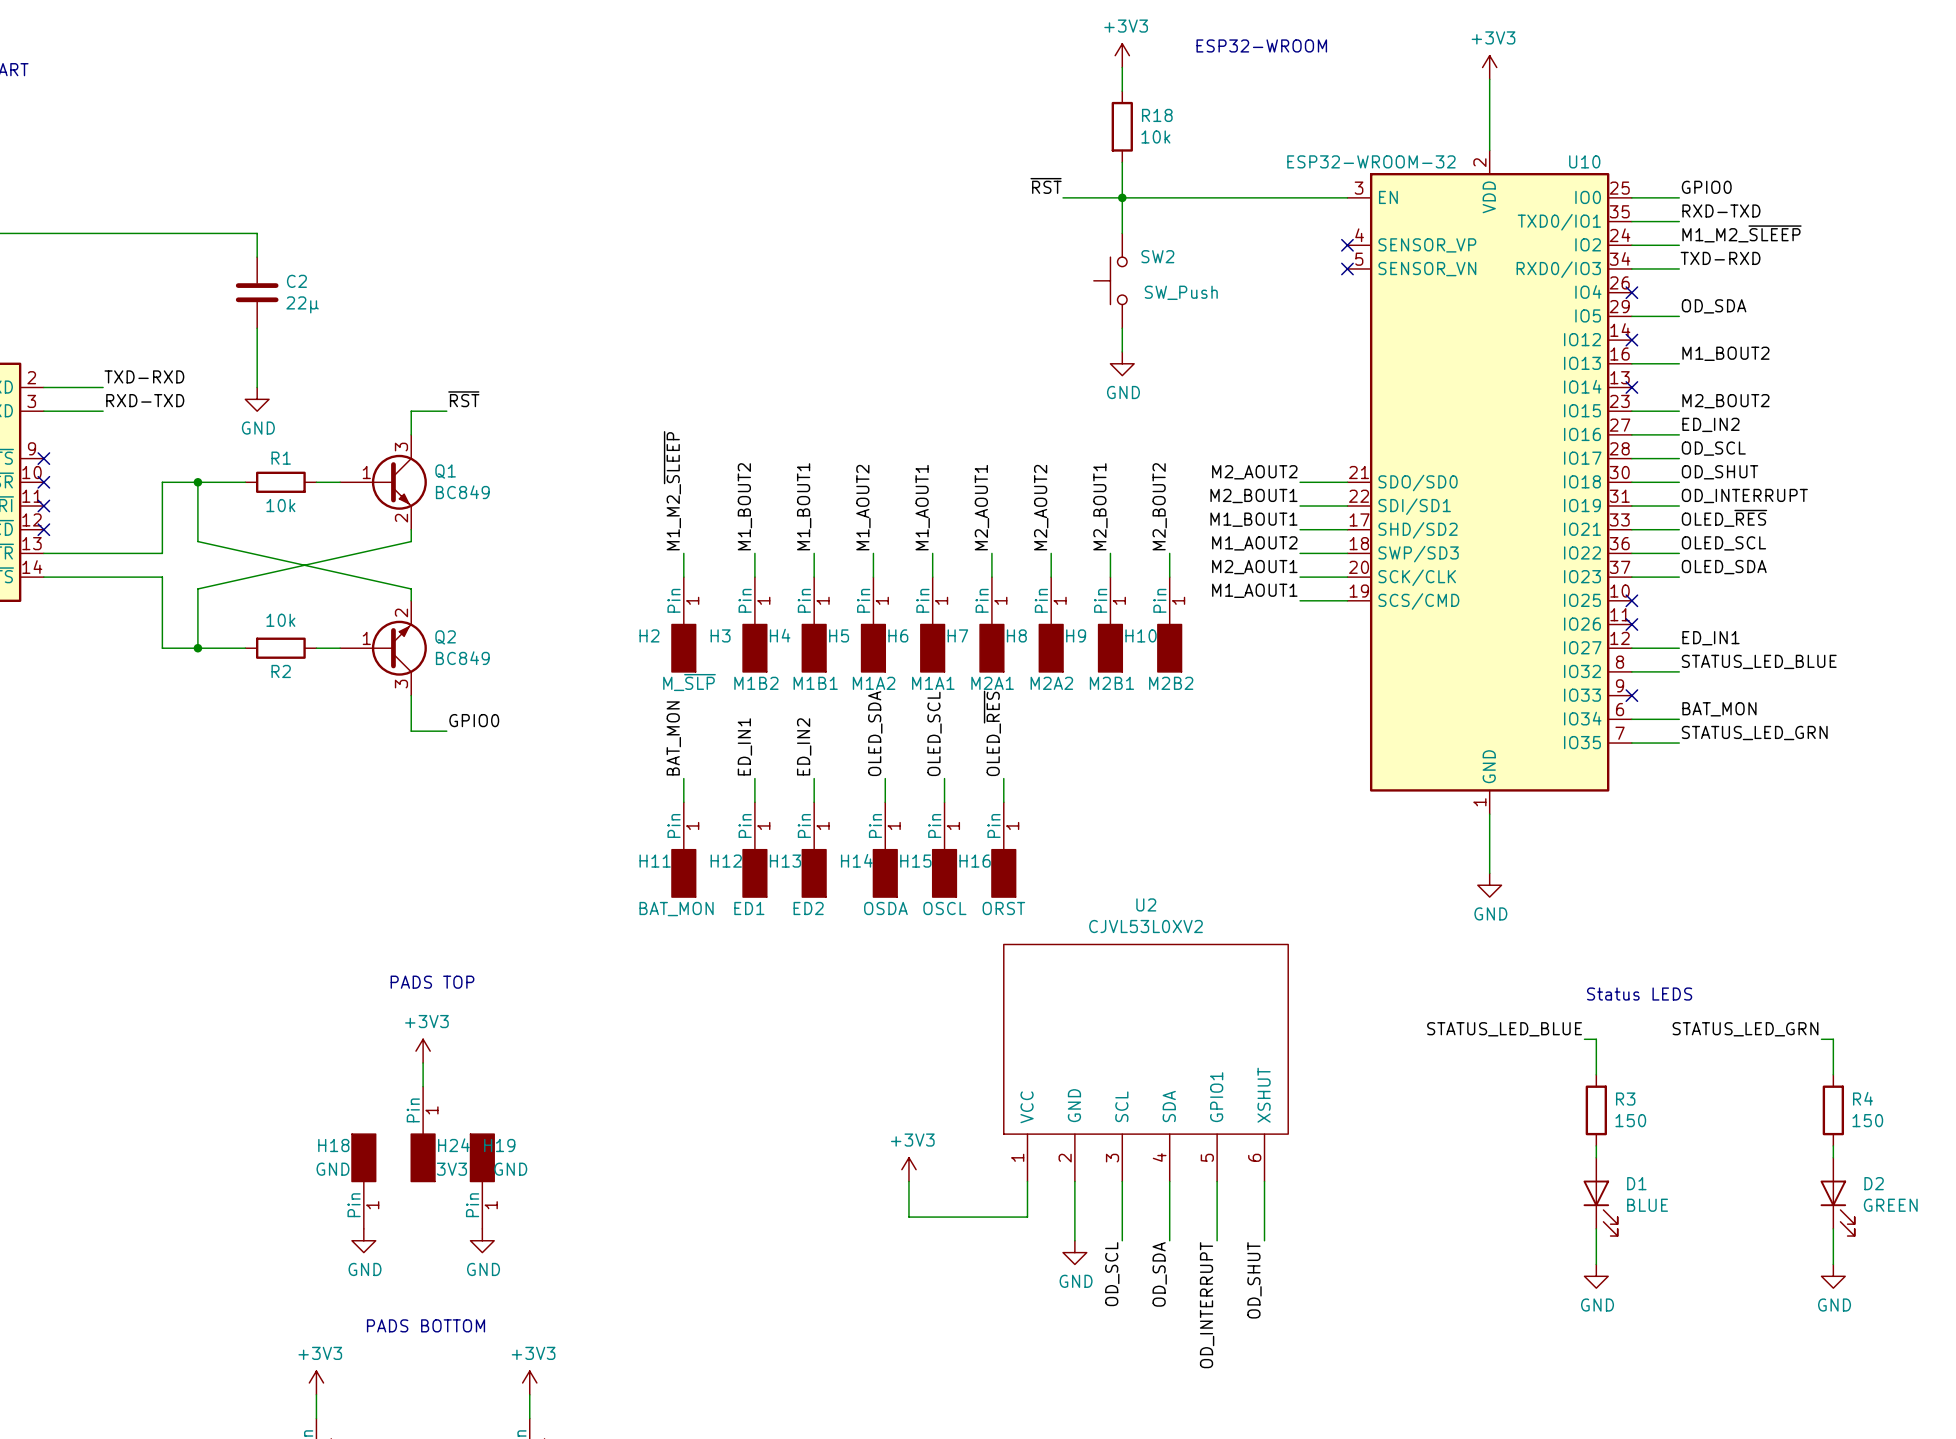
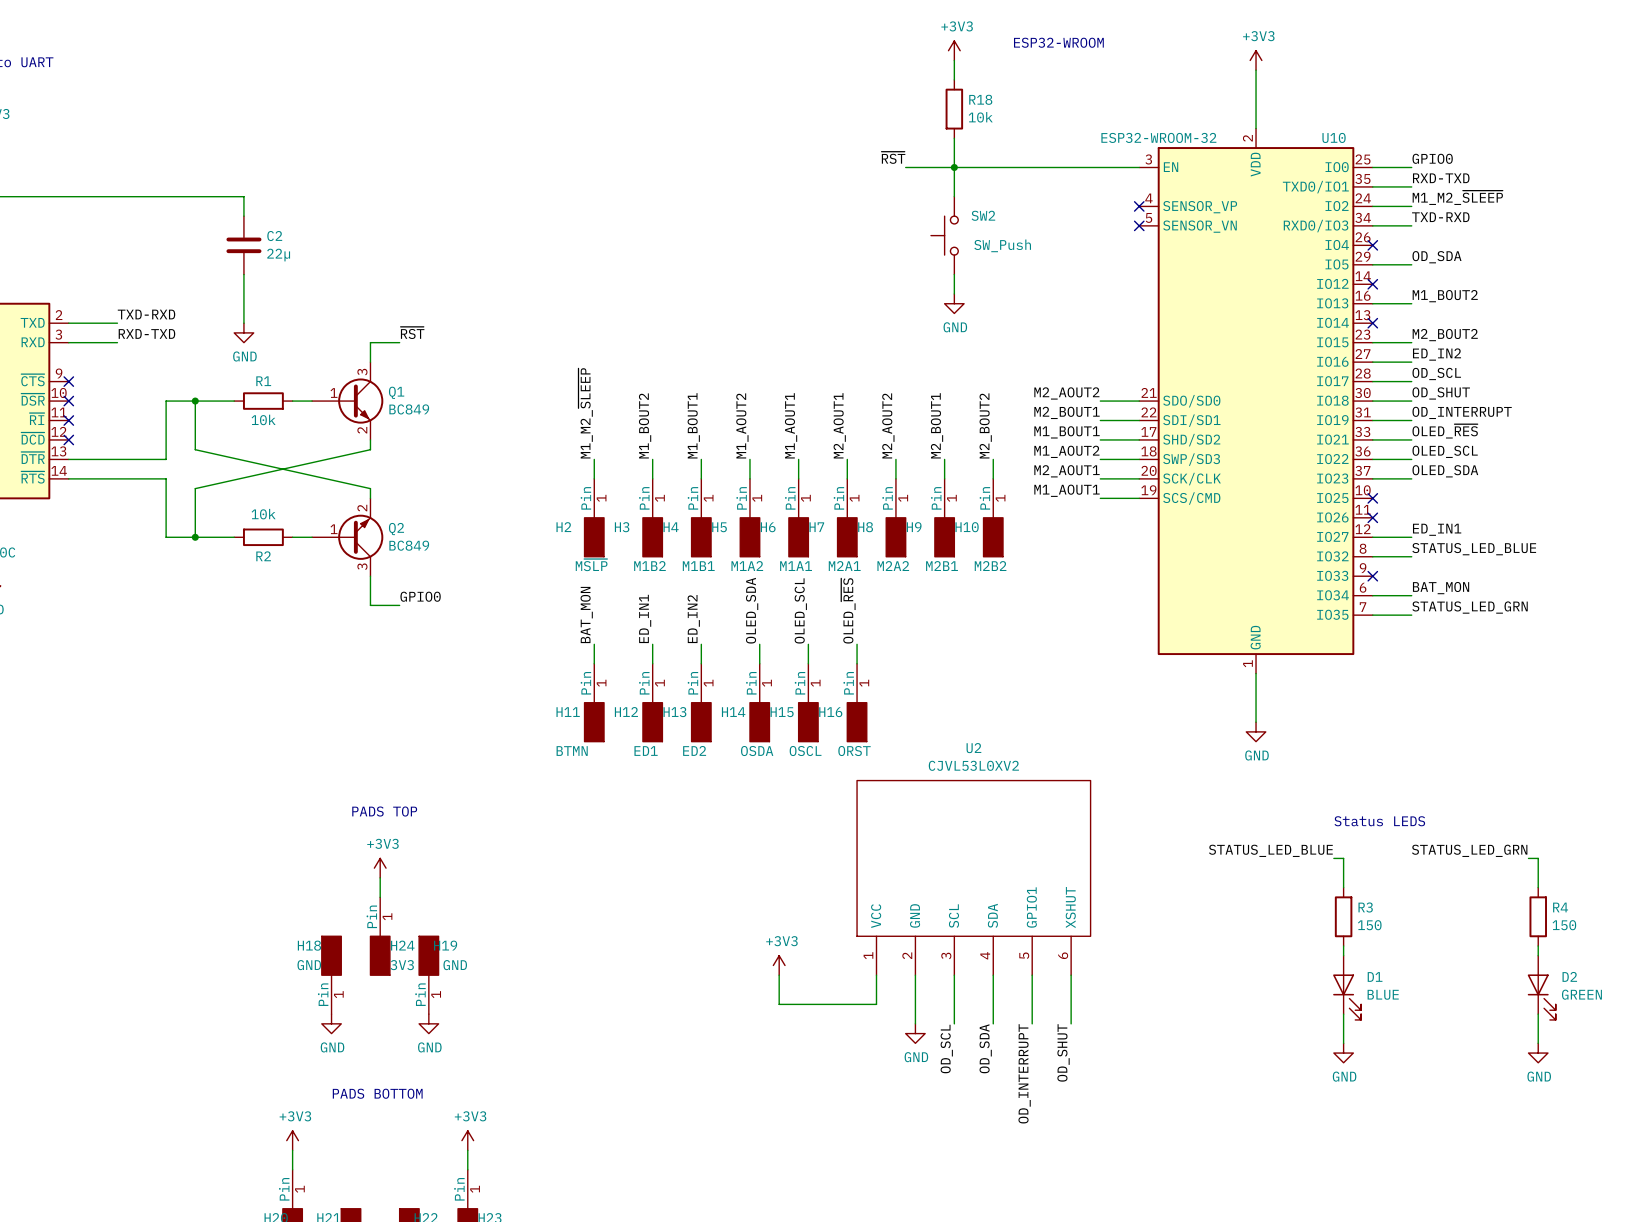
H2 value: M_~{SLP} (689, 682) -> M~{SLP} (591, 565)
H11 value: BAT_MON (676, 909) -> BTMN (572, 751)

